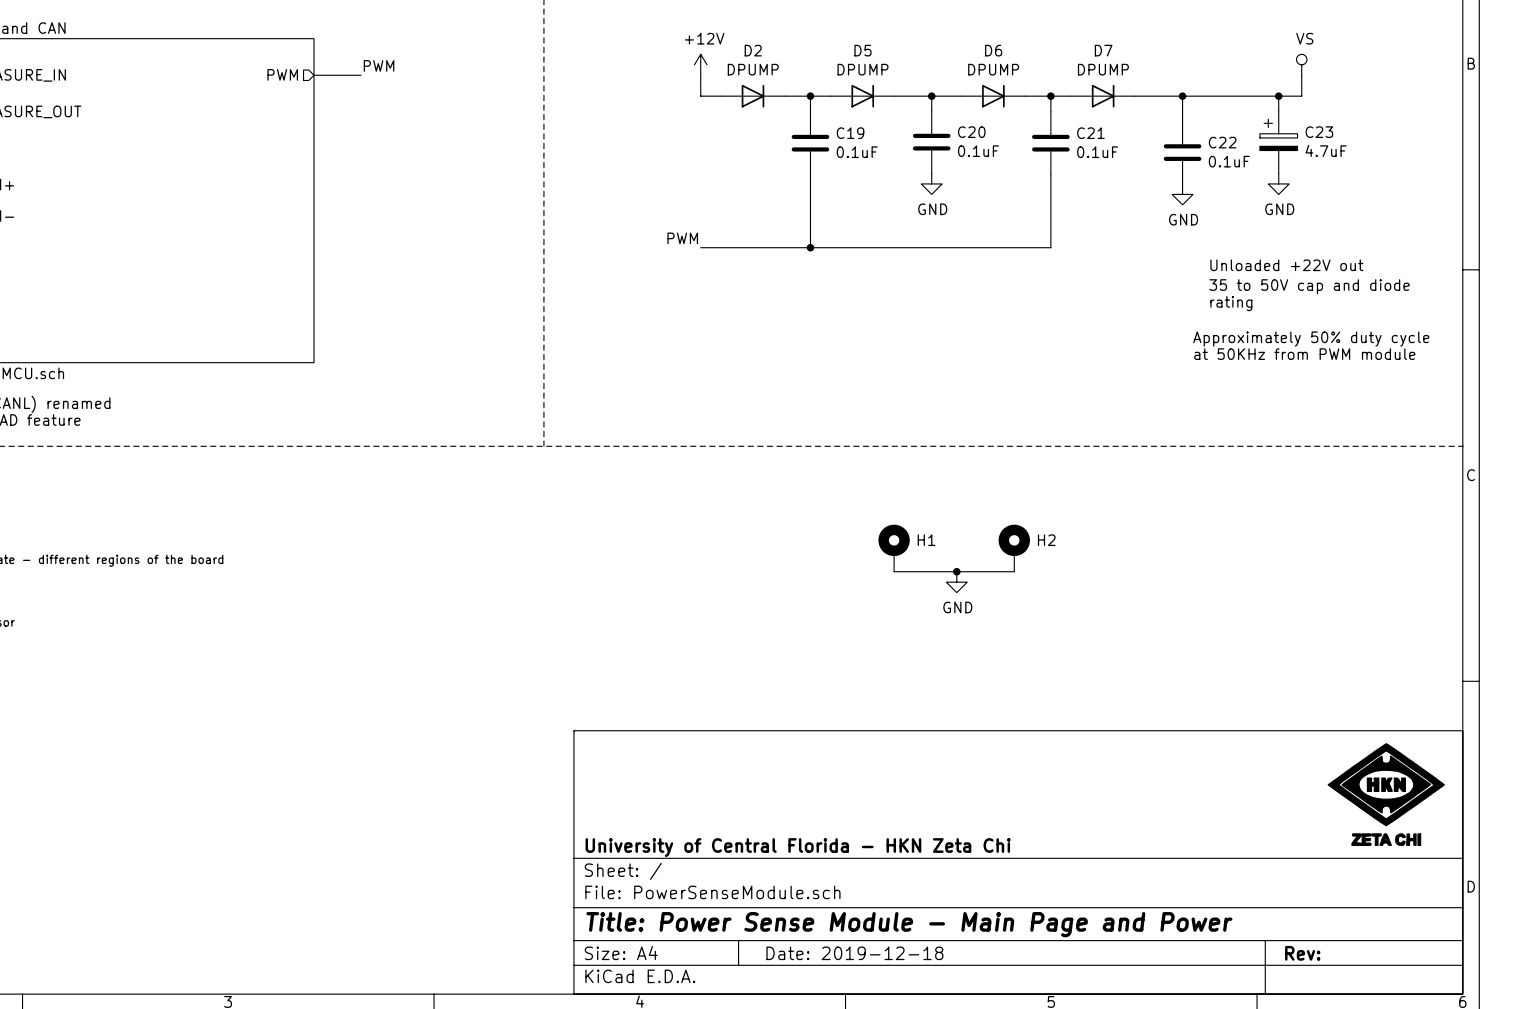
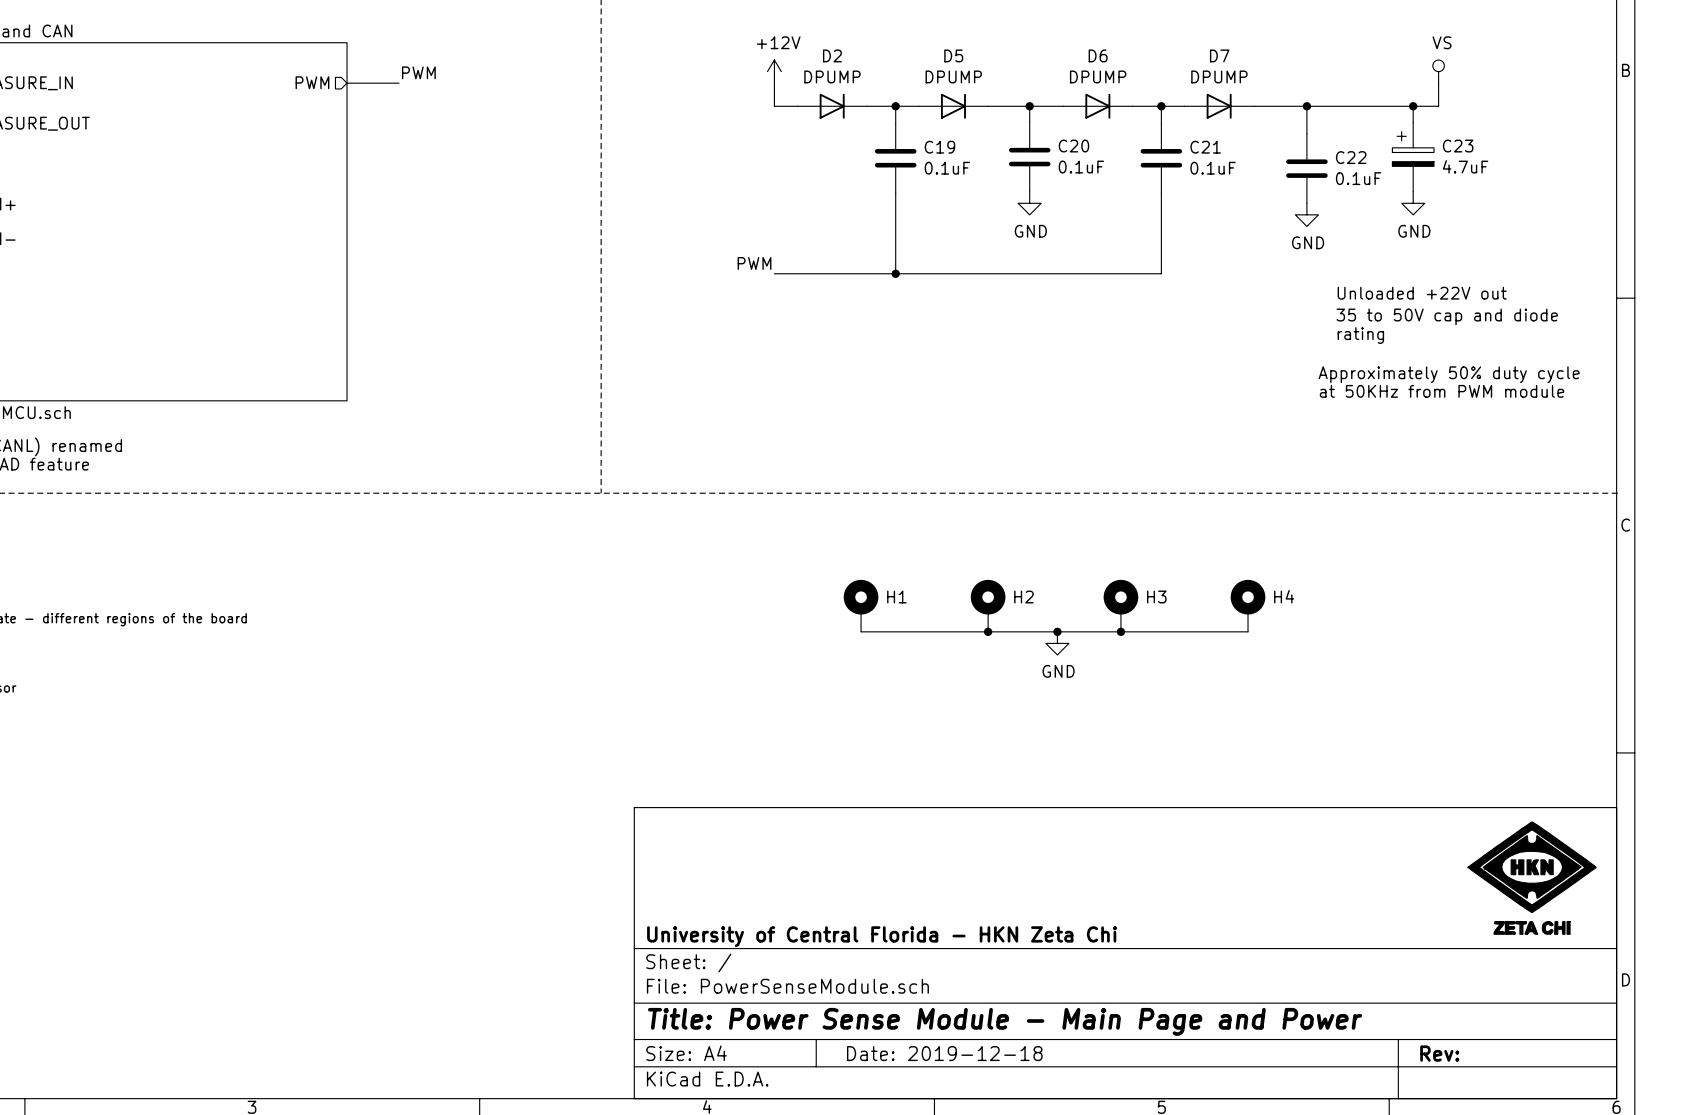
H1 name: H1 (926, 540) -> H2 (1023, 596)
H2 name: H2 (1046, 540) -> H3 (1156, 596)
H1: none -> (861, 605)
H4: none -> (1248, 605)
wire: none -> (861, 631) (988, 631)
junction: none -> (988, 631)
wire: none -> (1120, 631) (1248, 631)
junction: none -> (1120, 631)

